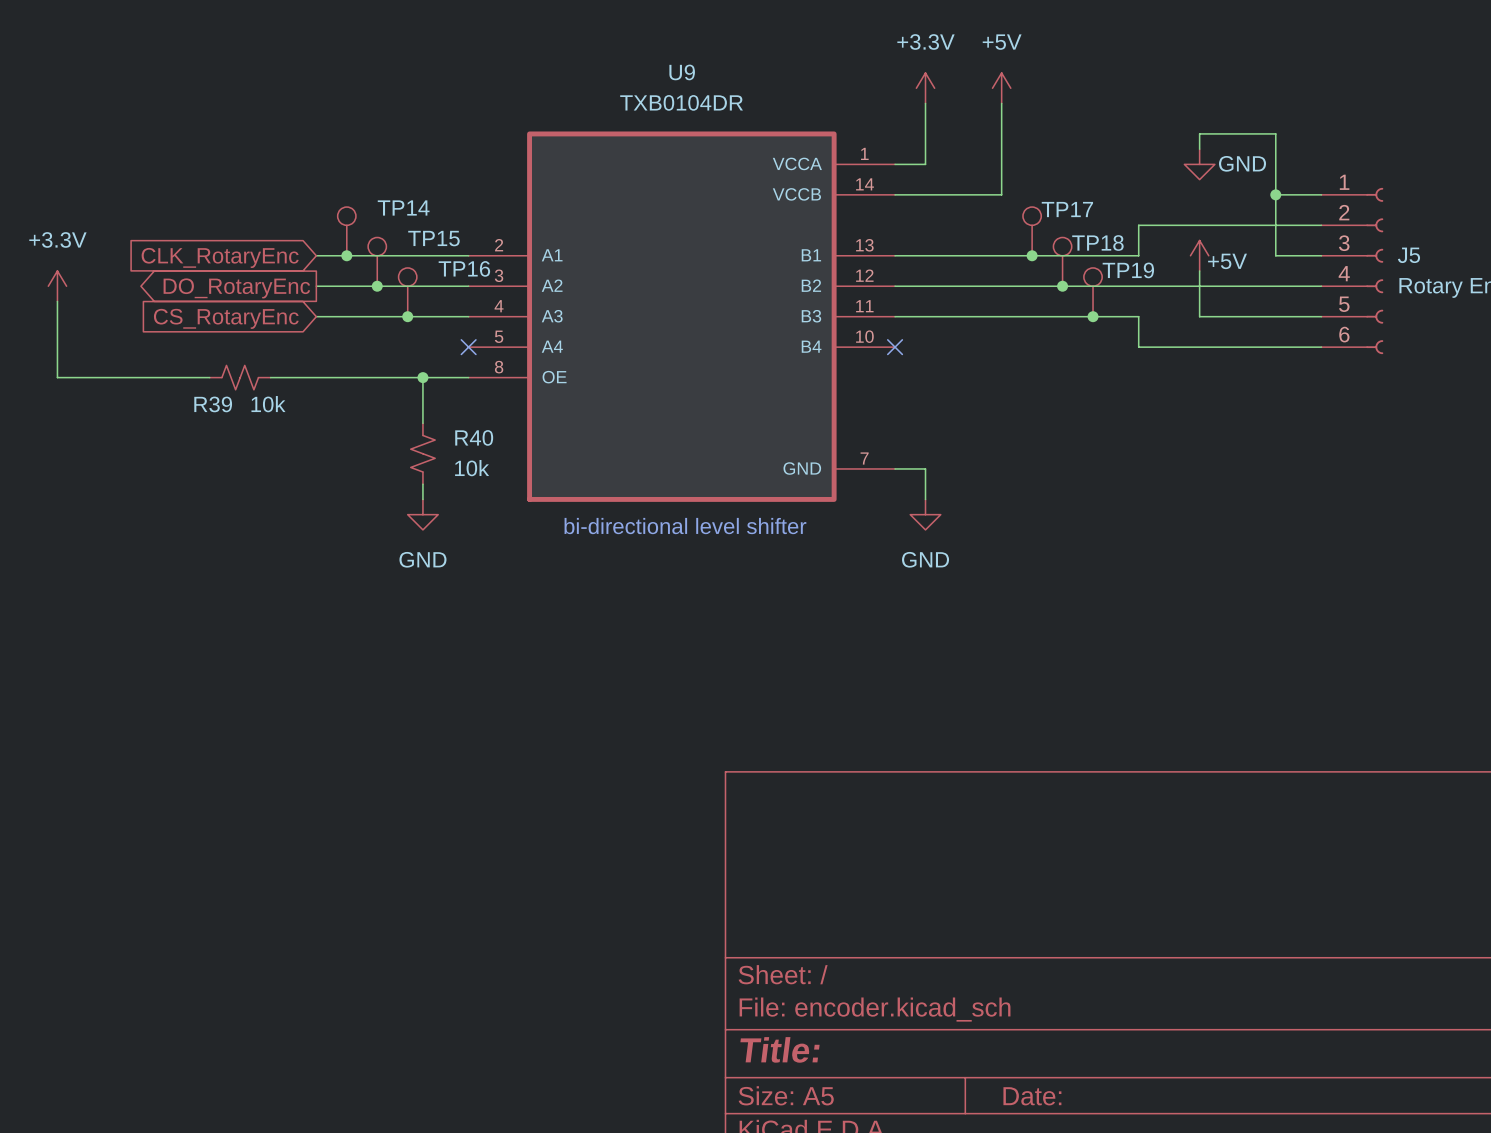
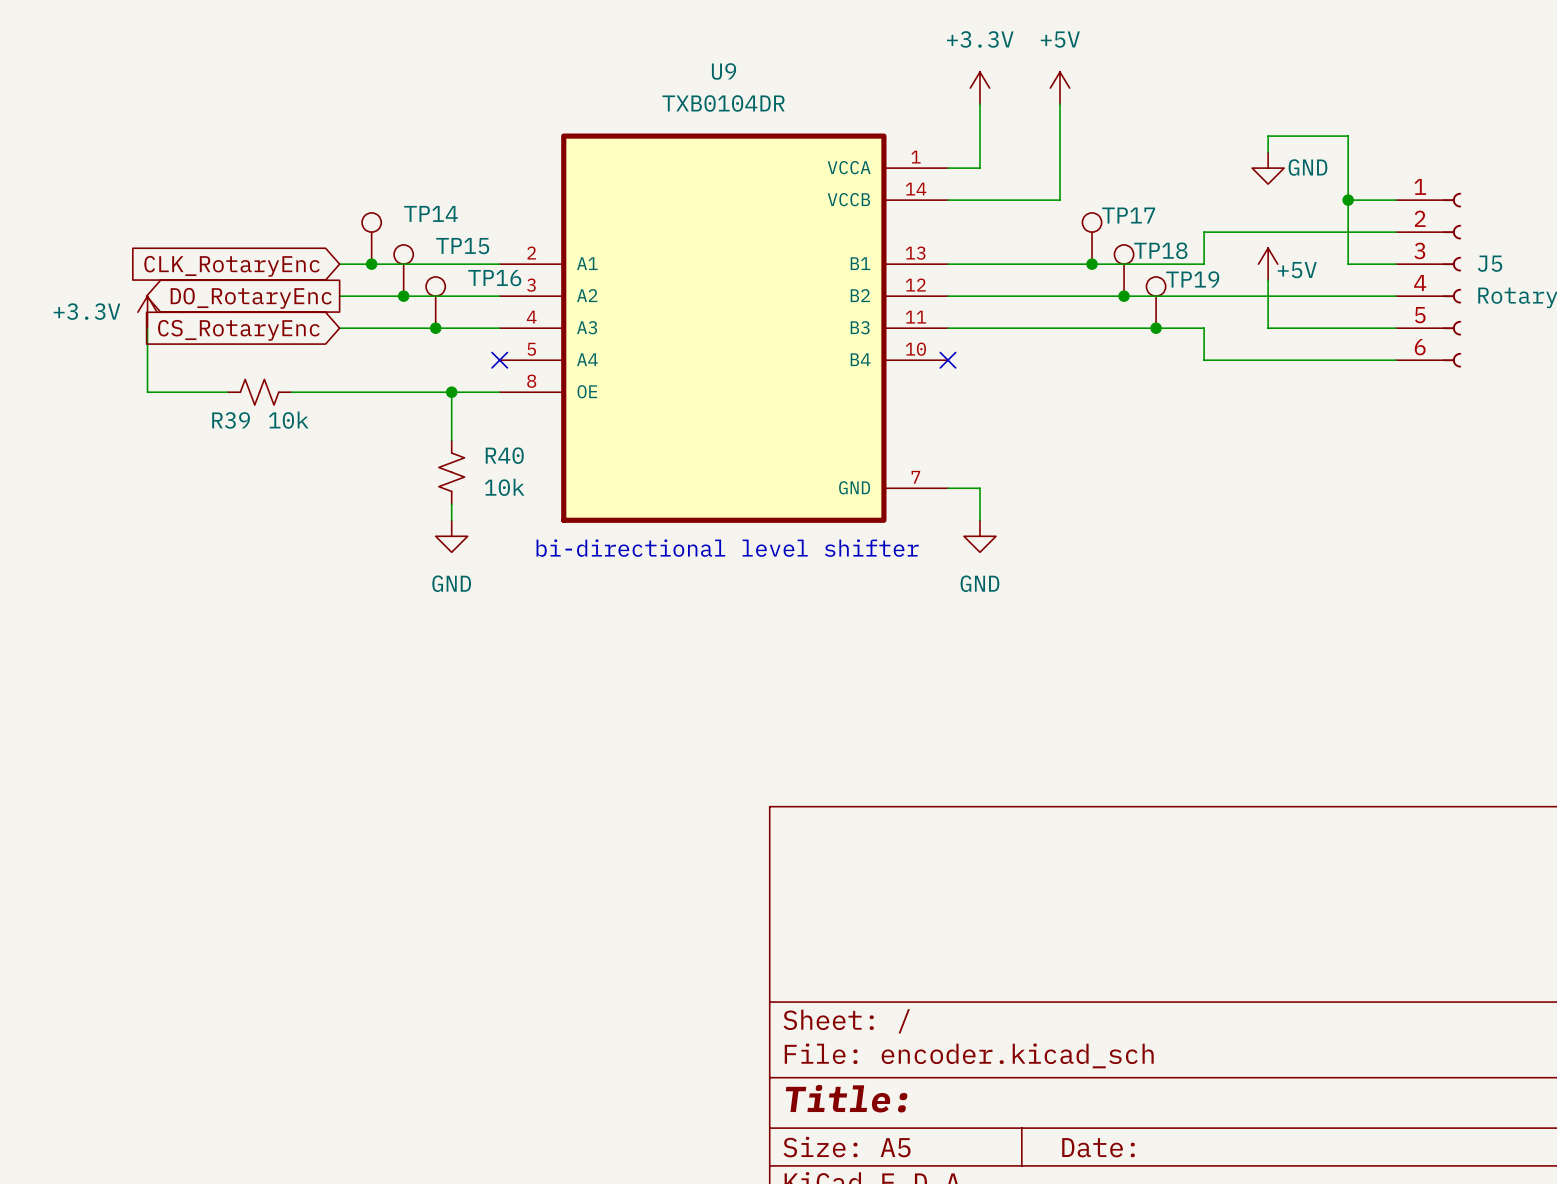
power symbol text position: +3.3V (57, 239) -> +3.3V (86, 311)
power symbol position: +3.3V (57, 286) -> +3.3V (147, 312)
wire: (57, 301) (57, 377) (133, 377) -> (147, 328) (147, 392)

